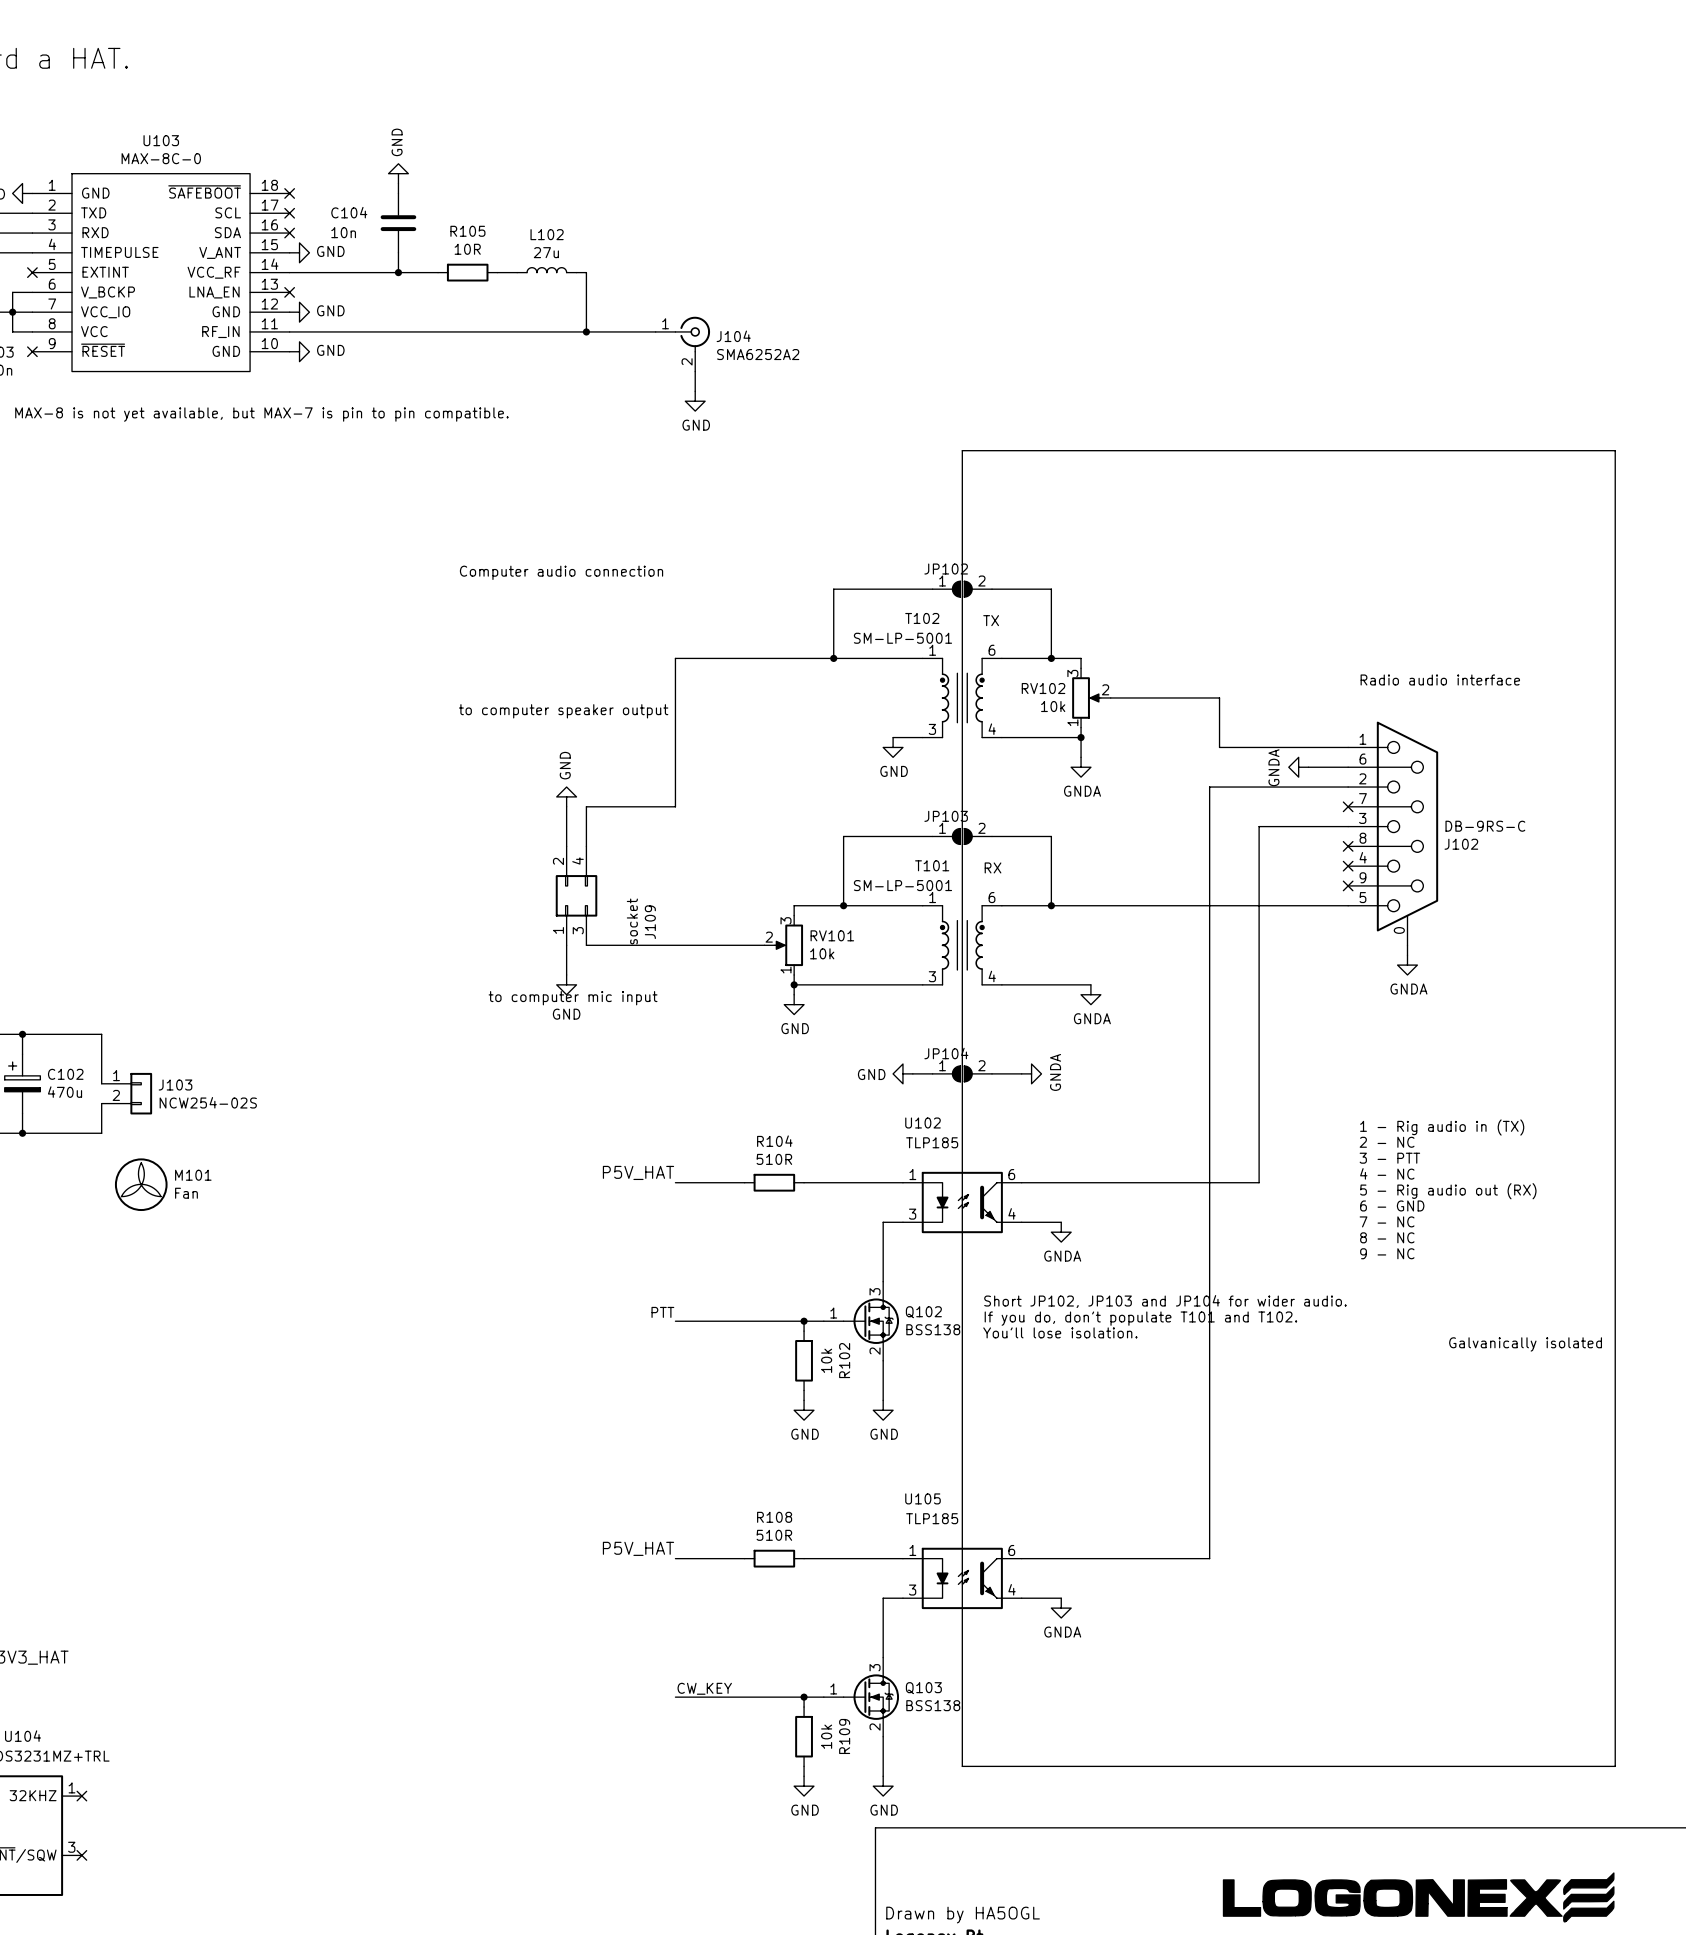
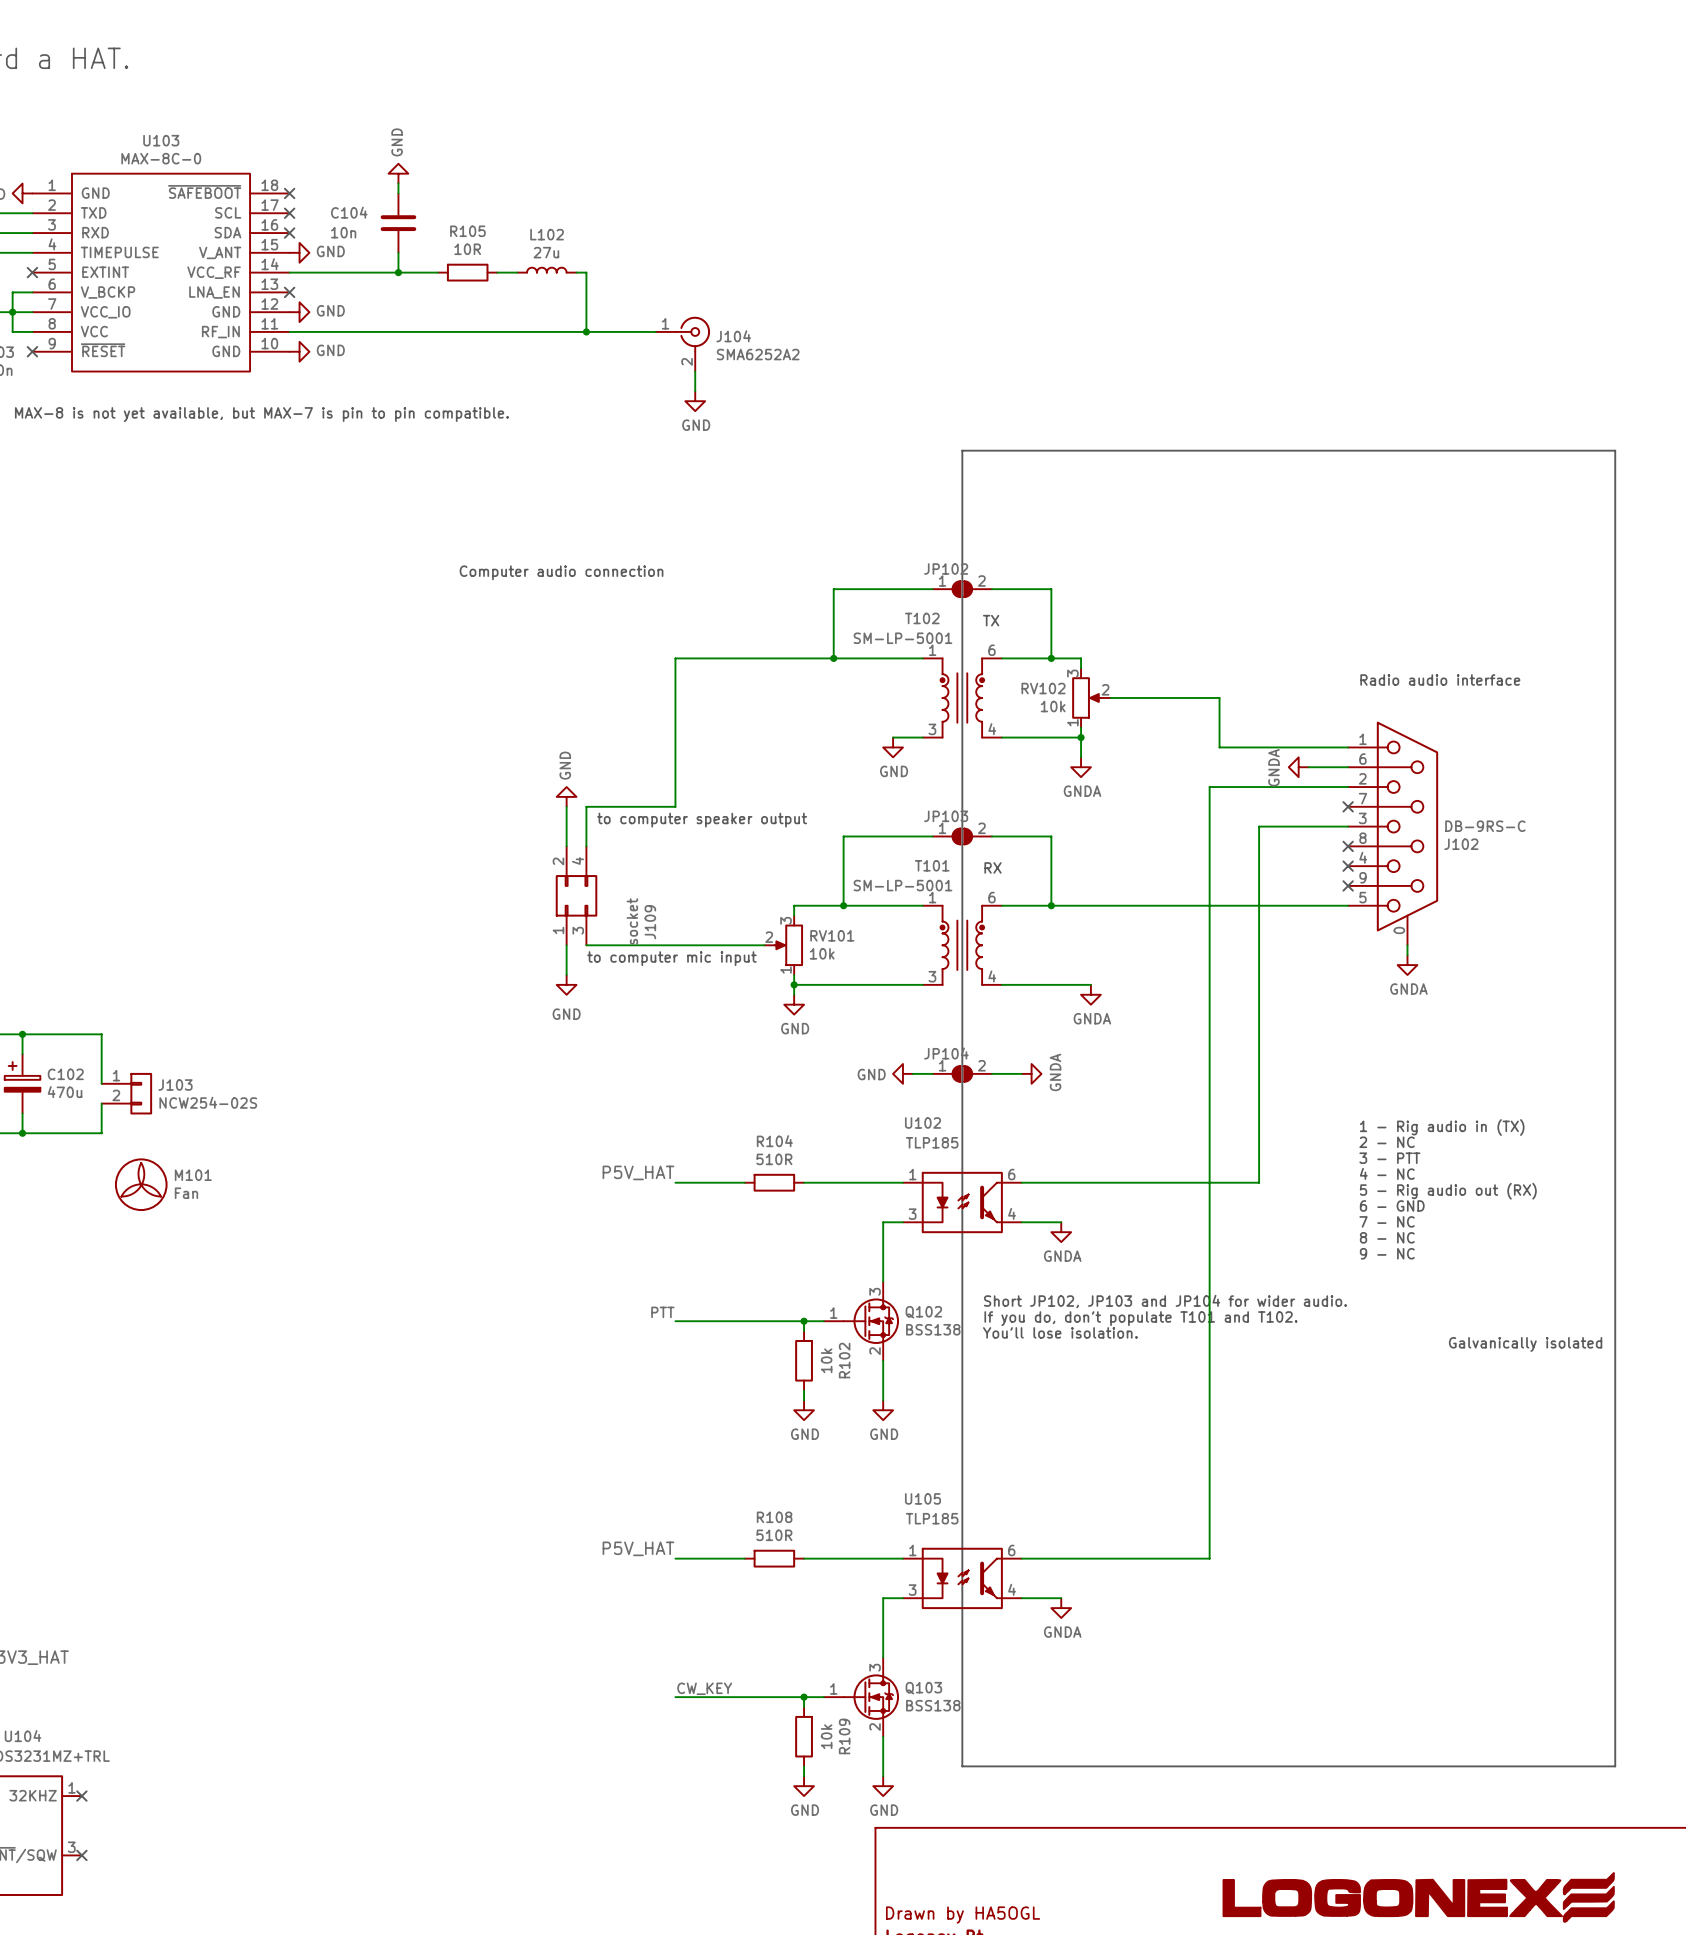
text position: to computer speaker output (563, 711) -> to computer speaker output (702, 820)
text position: to computer mic input (573, 998) -> to computer mic input (671, 958)

